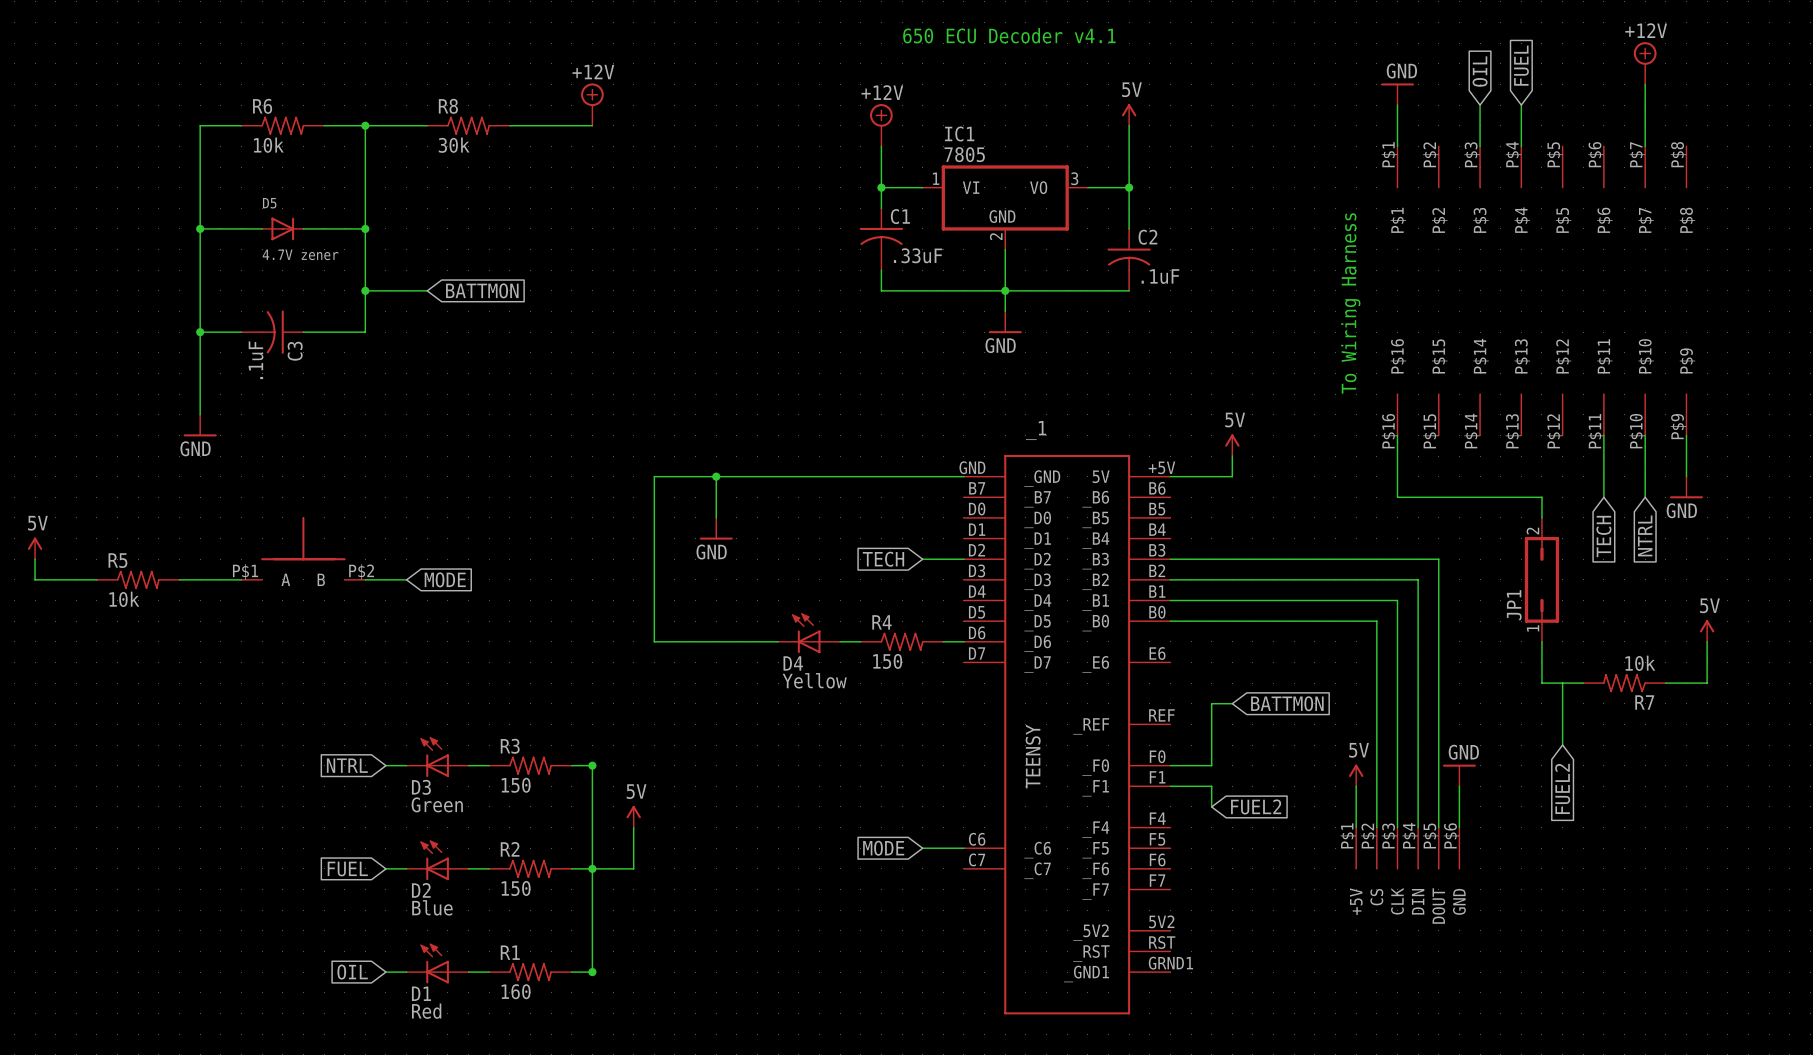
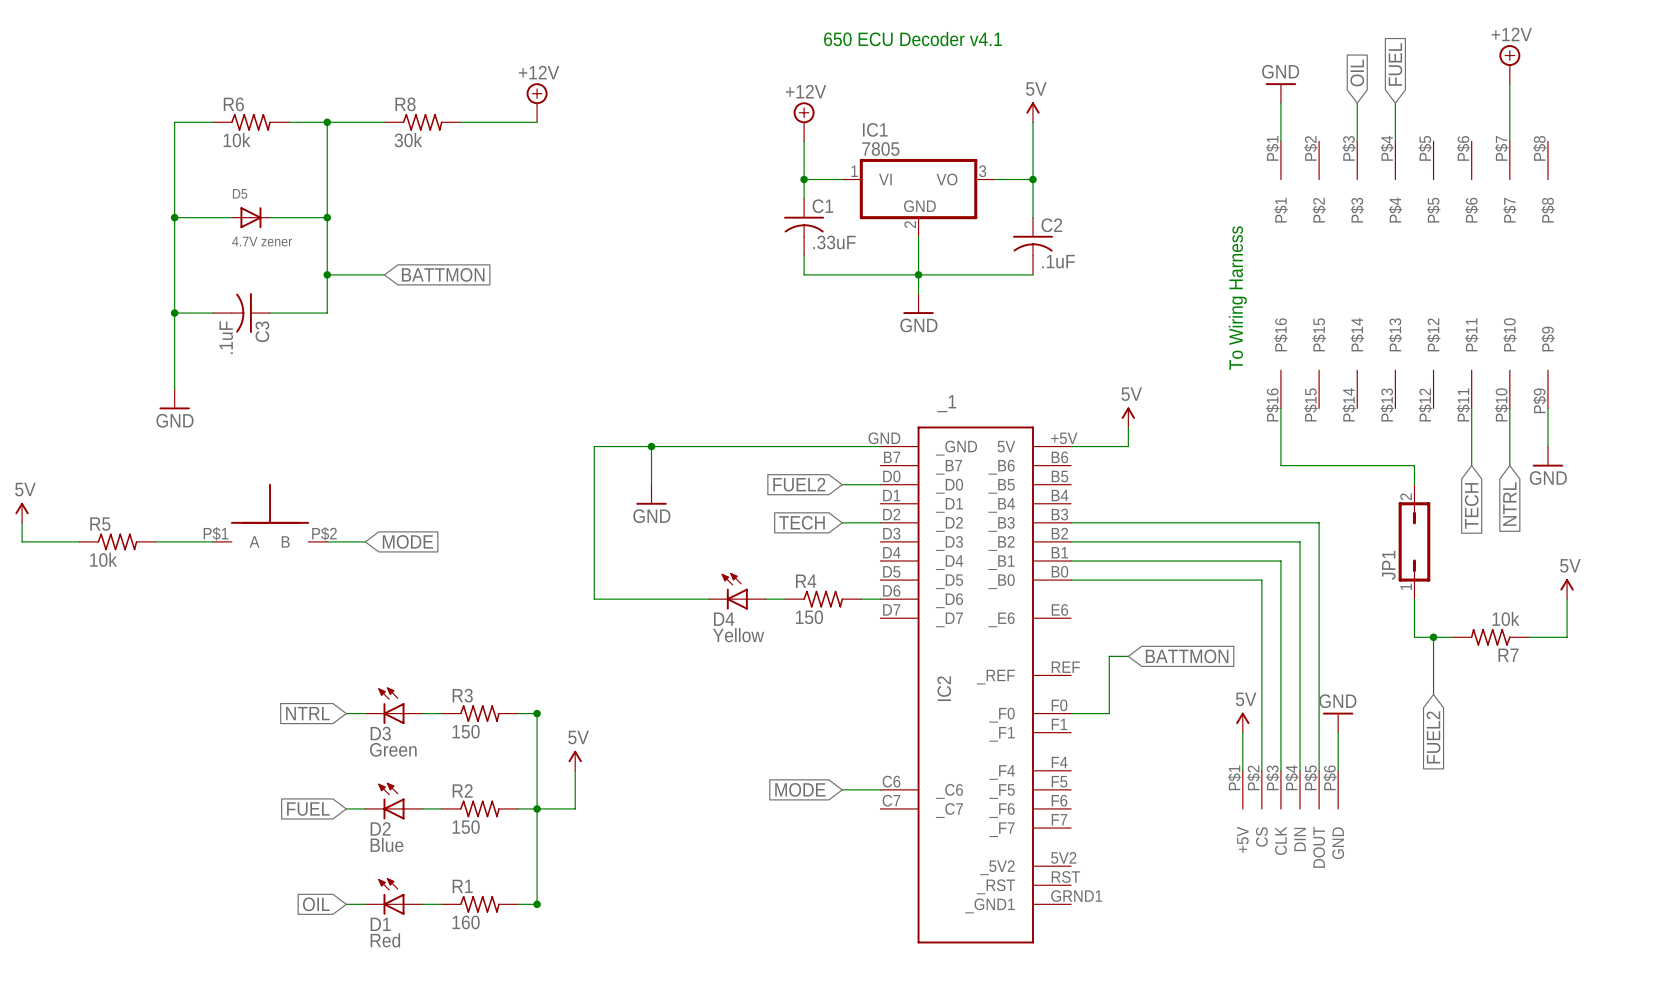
global label: none -> FUEL2 (799, 484)
wire: none -> (842, 484) (880, 484)
junction: none -> (1433, 637)
_1 value: TEENSY (1033, 756) -> IC2 (944, 688)
wire: (1170, 786) (1211, 786) (1211, 806) -> none
global label: FUEL2 (1256, 806) -> none

